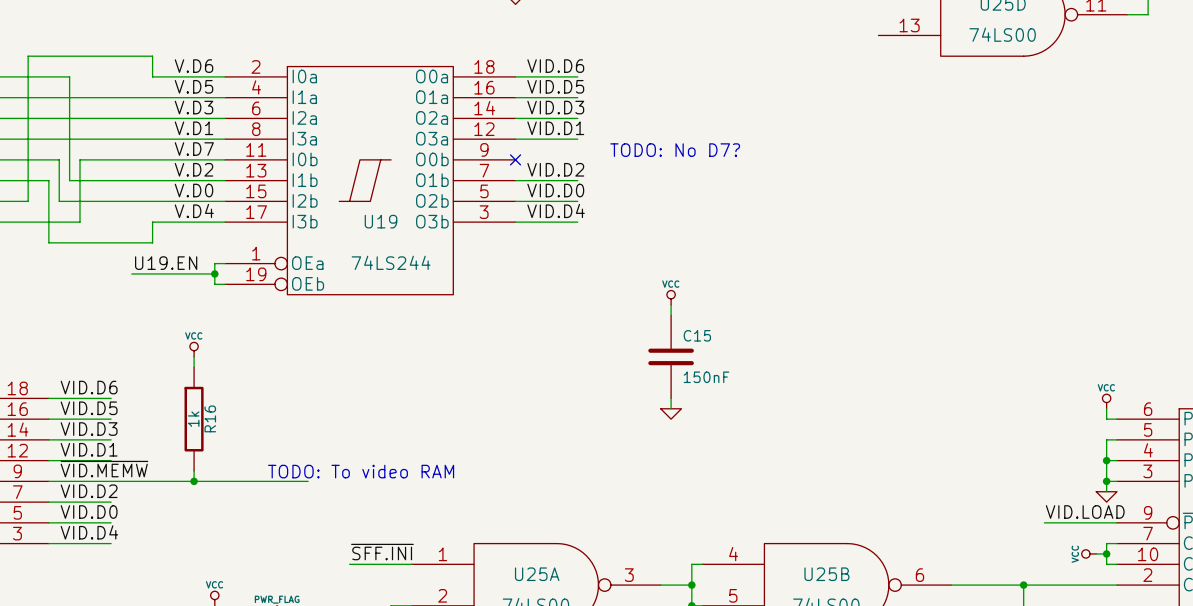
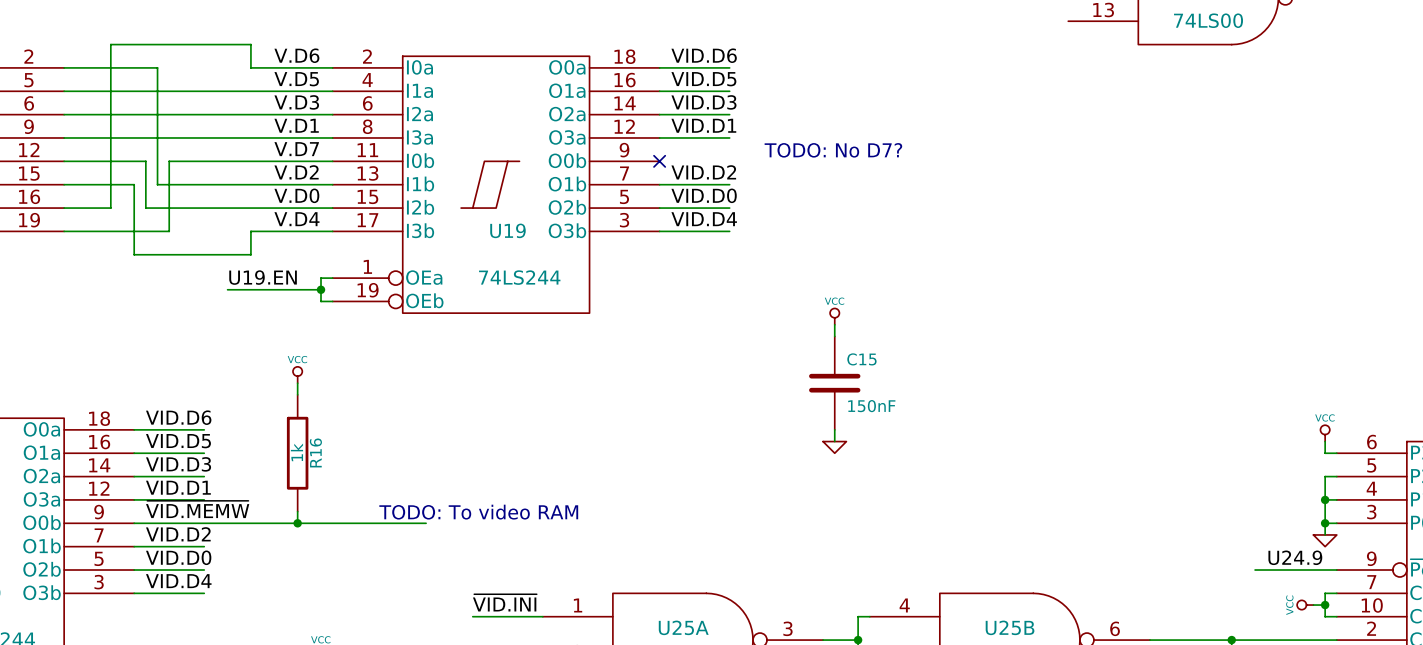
label: none -> U24.9 (1295, 557)
label: VID.LOAD (1085, 511) -> none
label: ~{SFF.INI} (382, 552) -> ~{VID.INI} (504, 602)

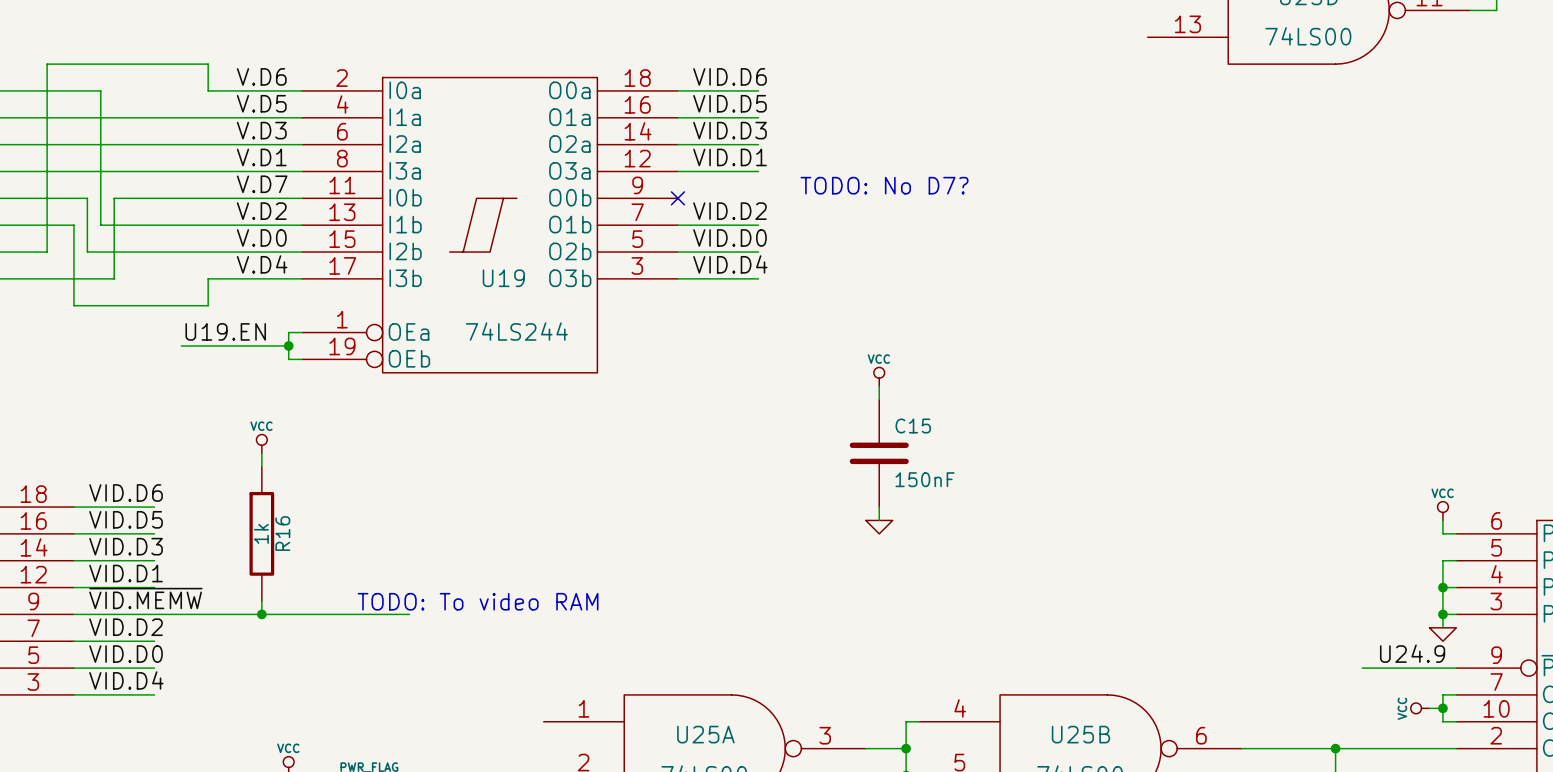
label: ~{VID.INI} (504, 602) -> none
wire: (472, 616) (542, 616) -> none

